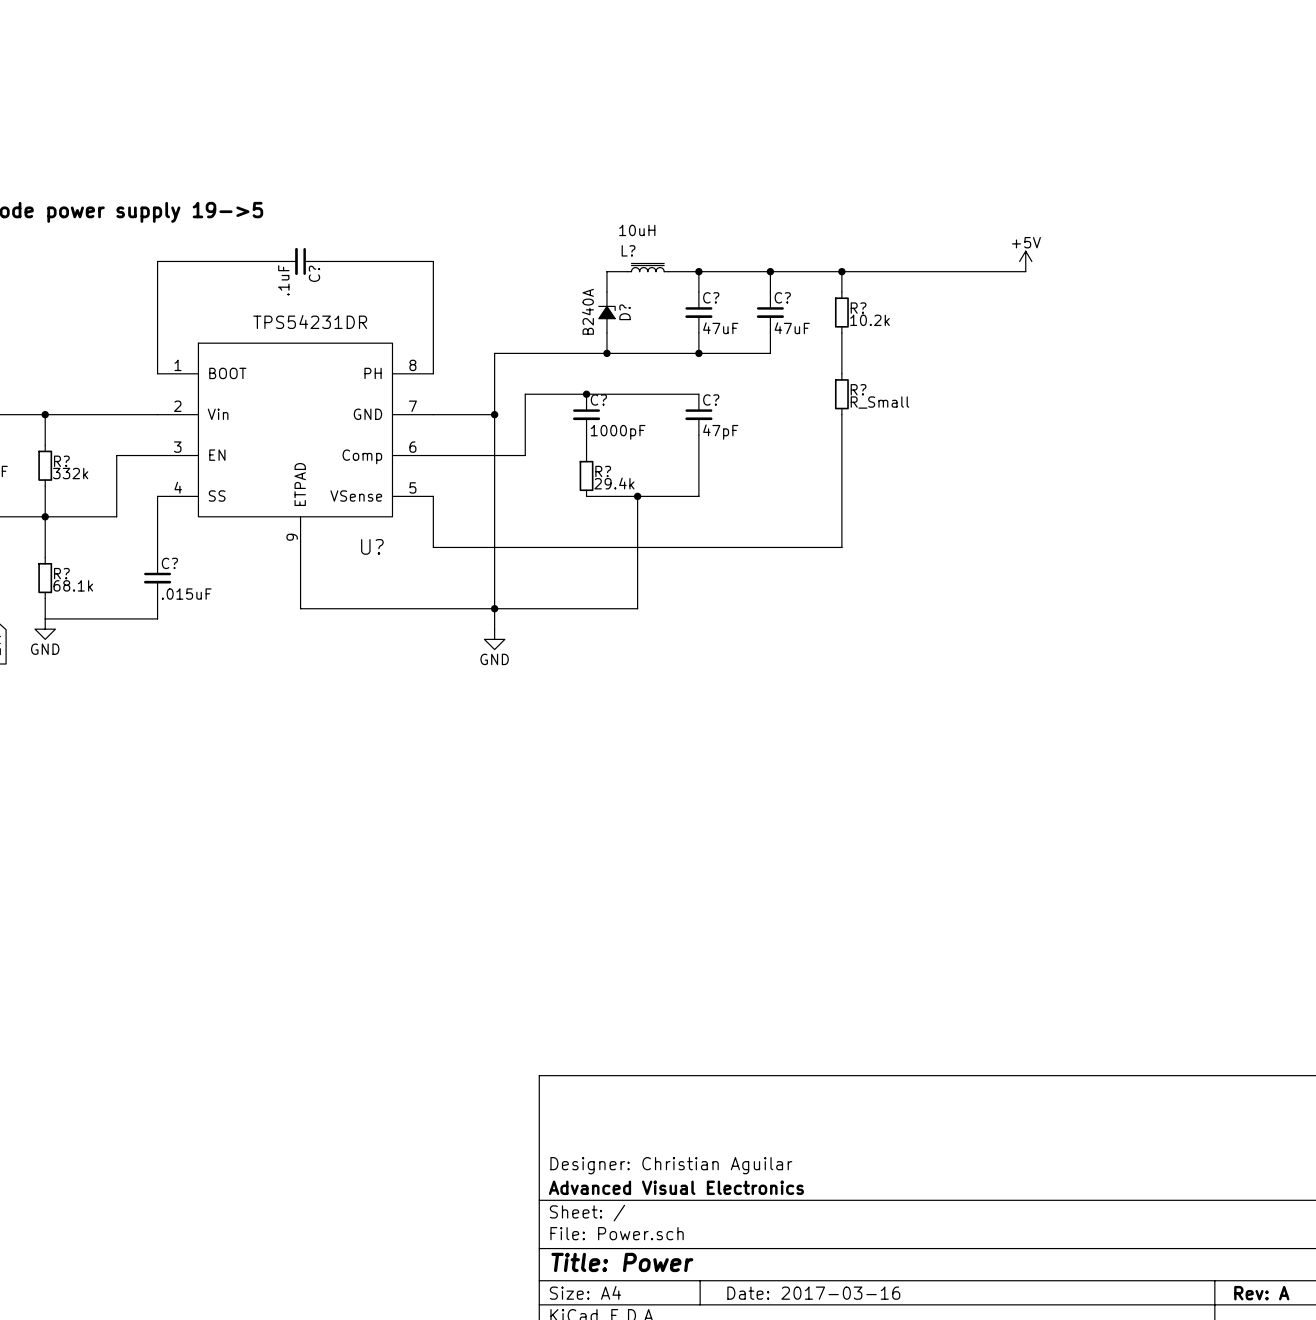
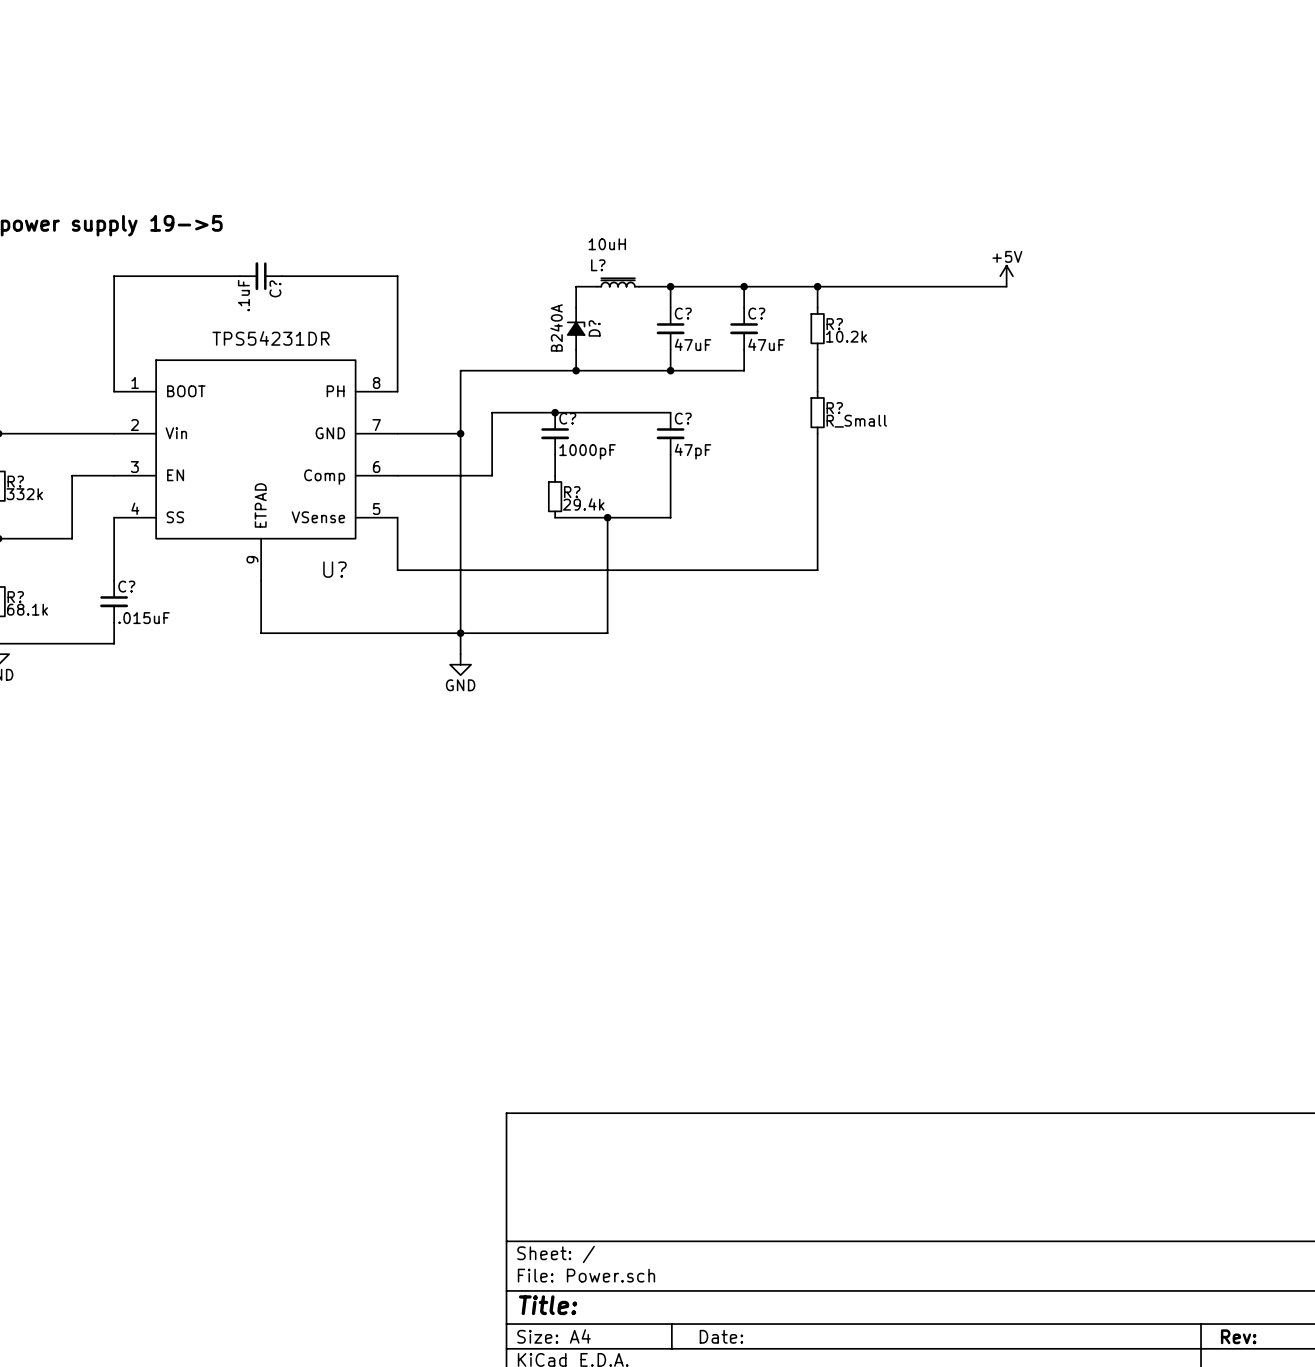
title block: Designer: Christian Aguilar (671, 1165) -> none
title block: Advanced Visual Electronics (676, 1187) -> none
title block: Title: Power (622, 1262) -> Title: (548, 1305)
title block: Date: 2017-03-16 (813, 1293) -> Date: (721, 1336)
title block: Rev: A (1261, 1293) -> Rev: (1238, 1336)

